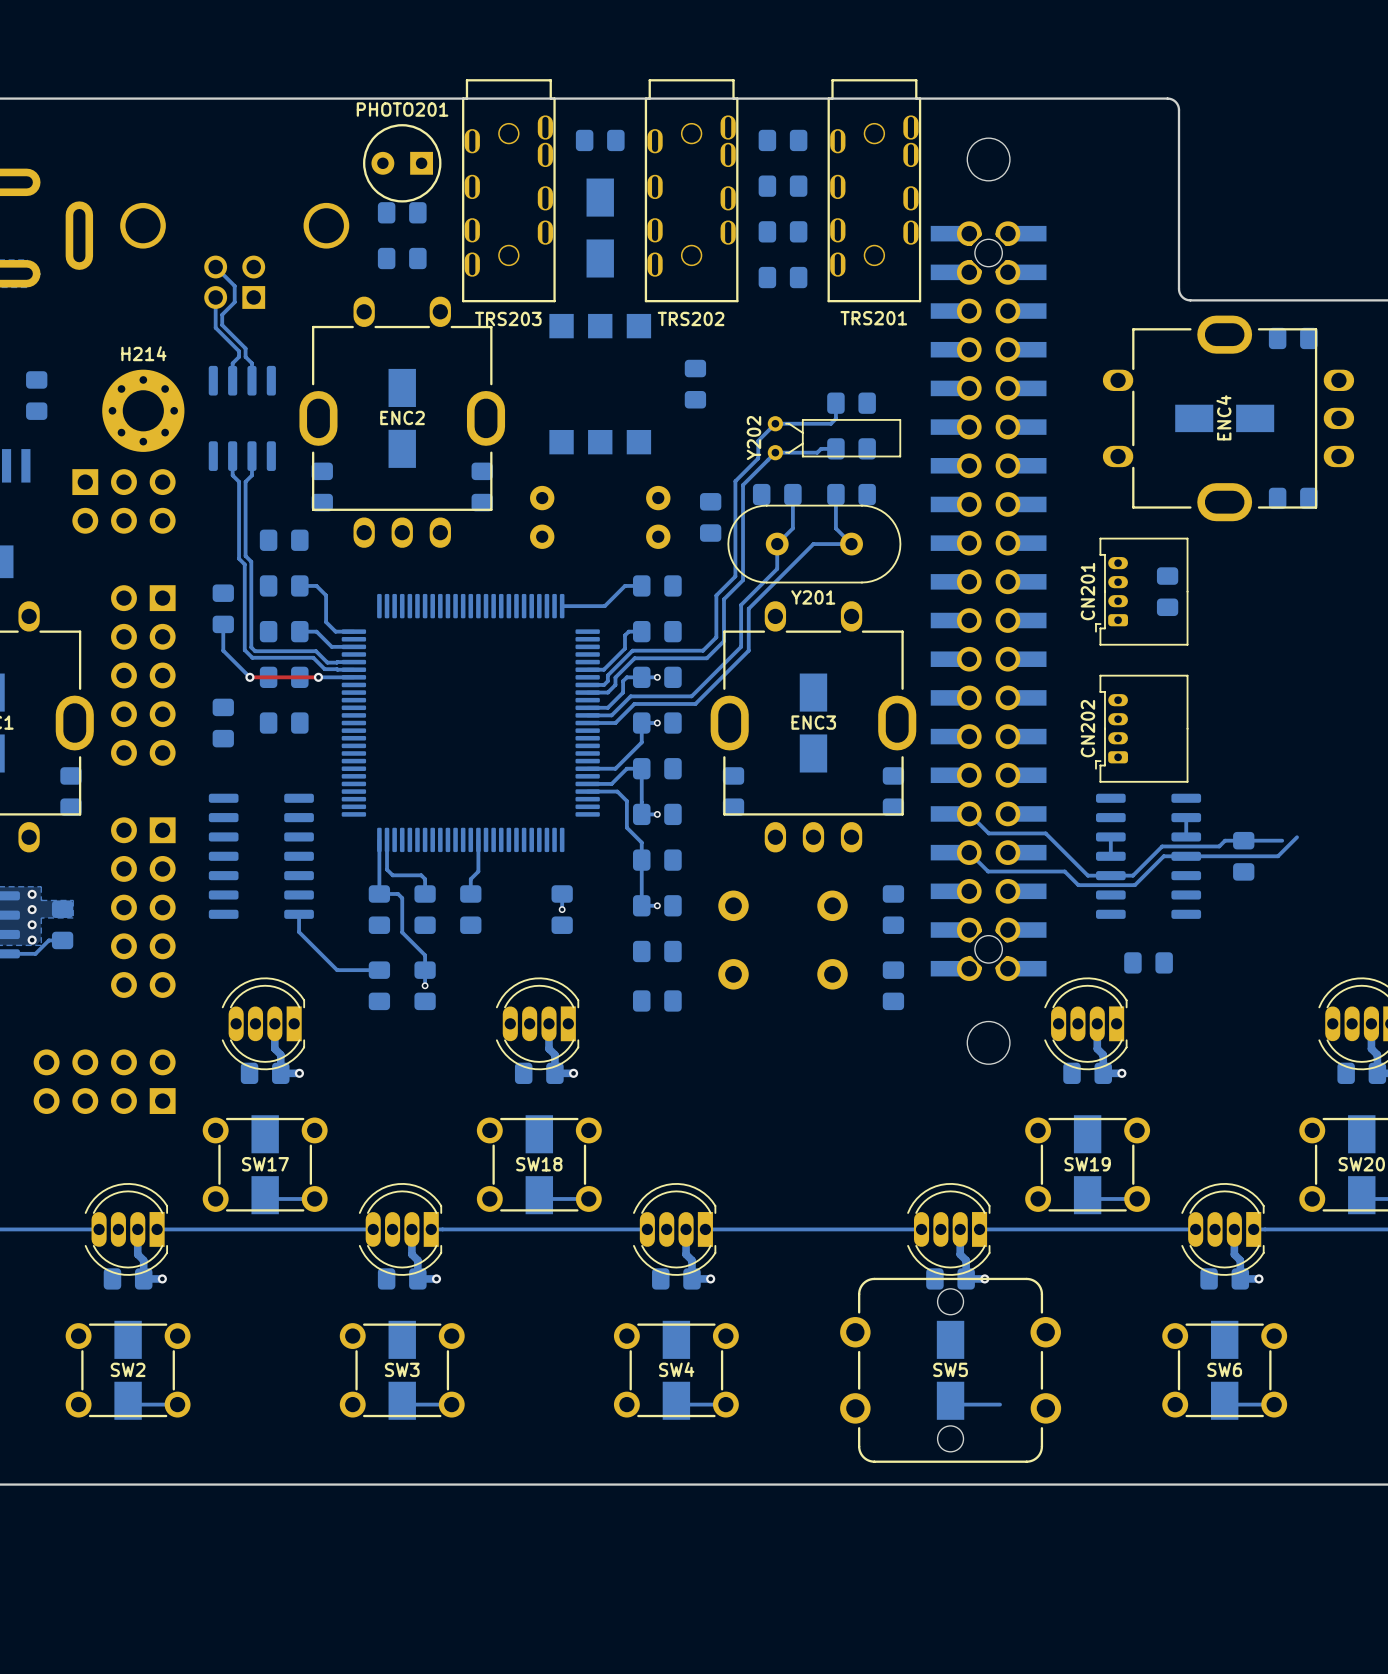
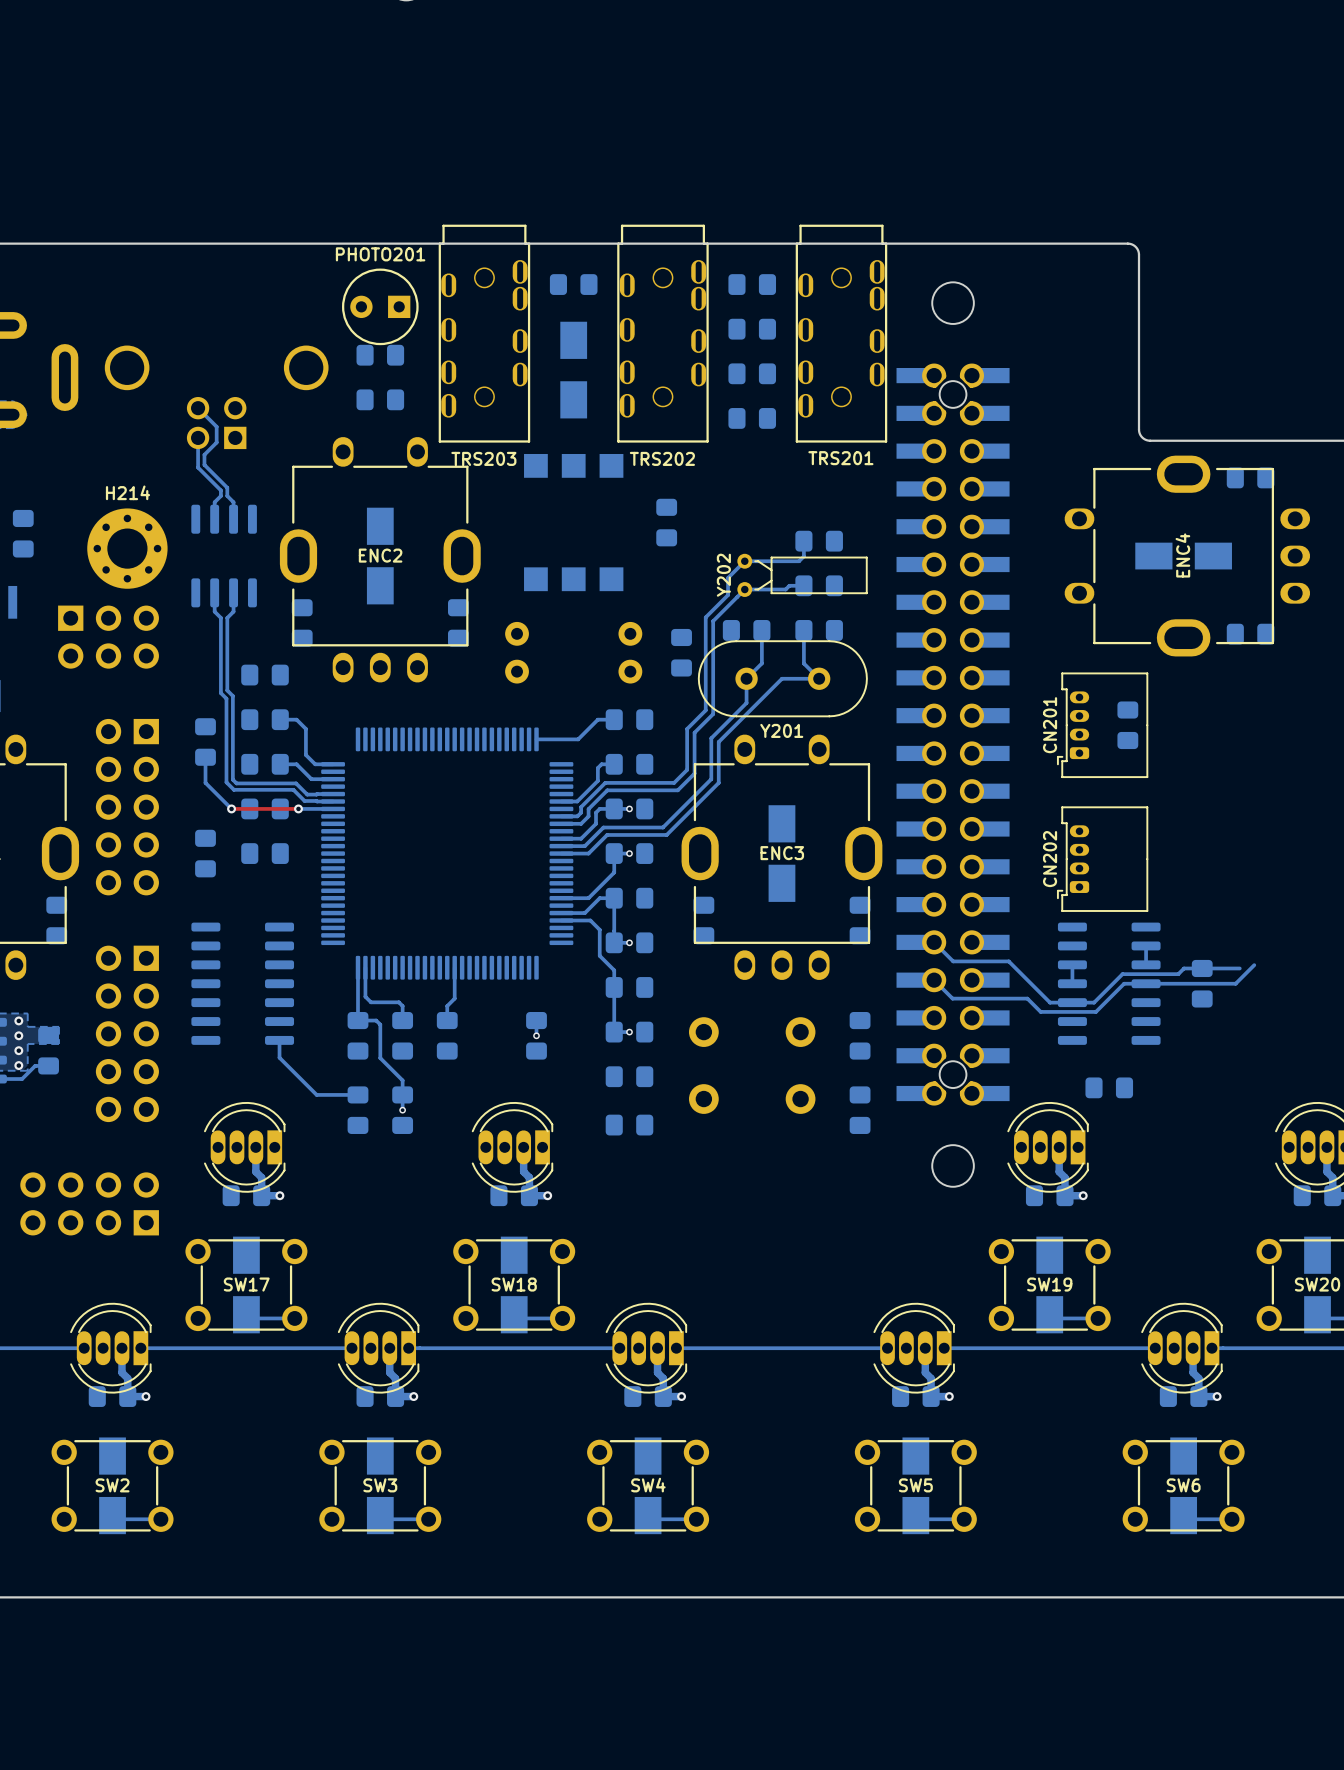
SW5 footprint: [840, 1277, 1062, 1463] -> [854, 1439, 977, 1532]

